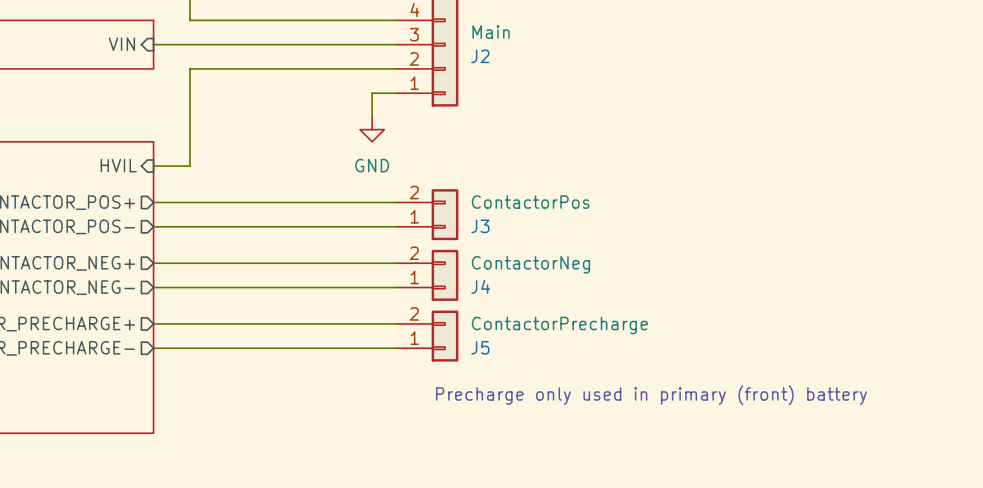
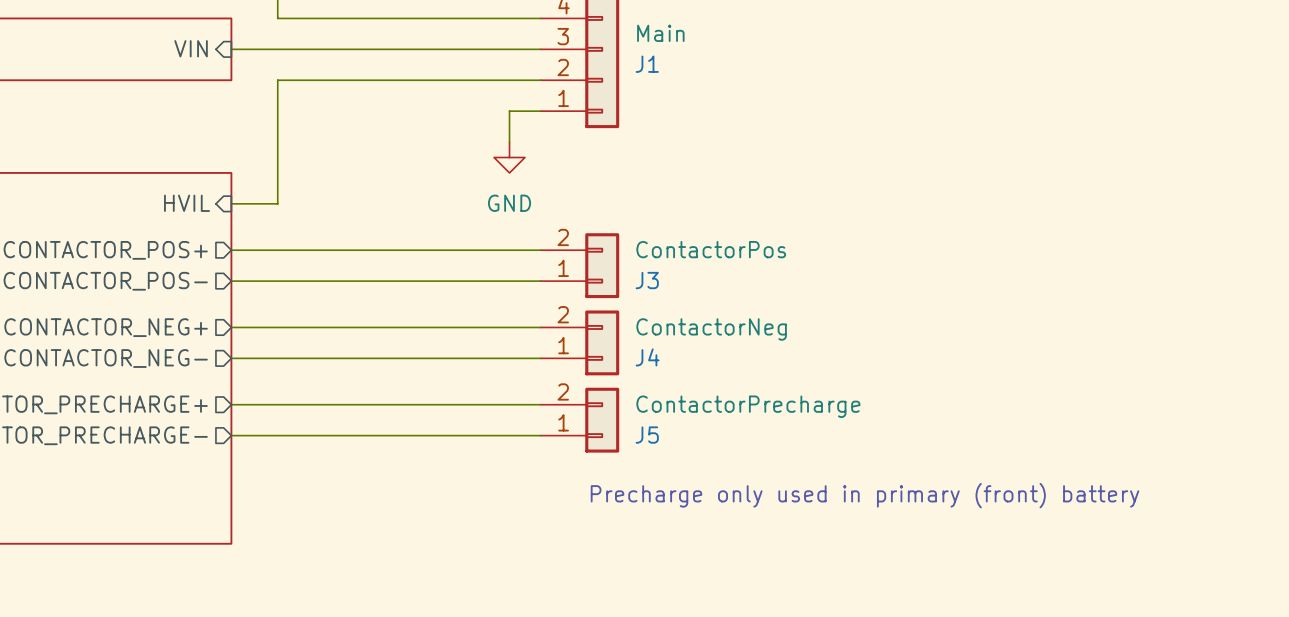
J2 name: J2 (480, 56) -> J1 (647, 64)

